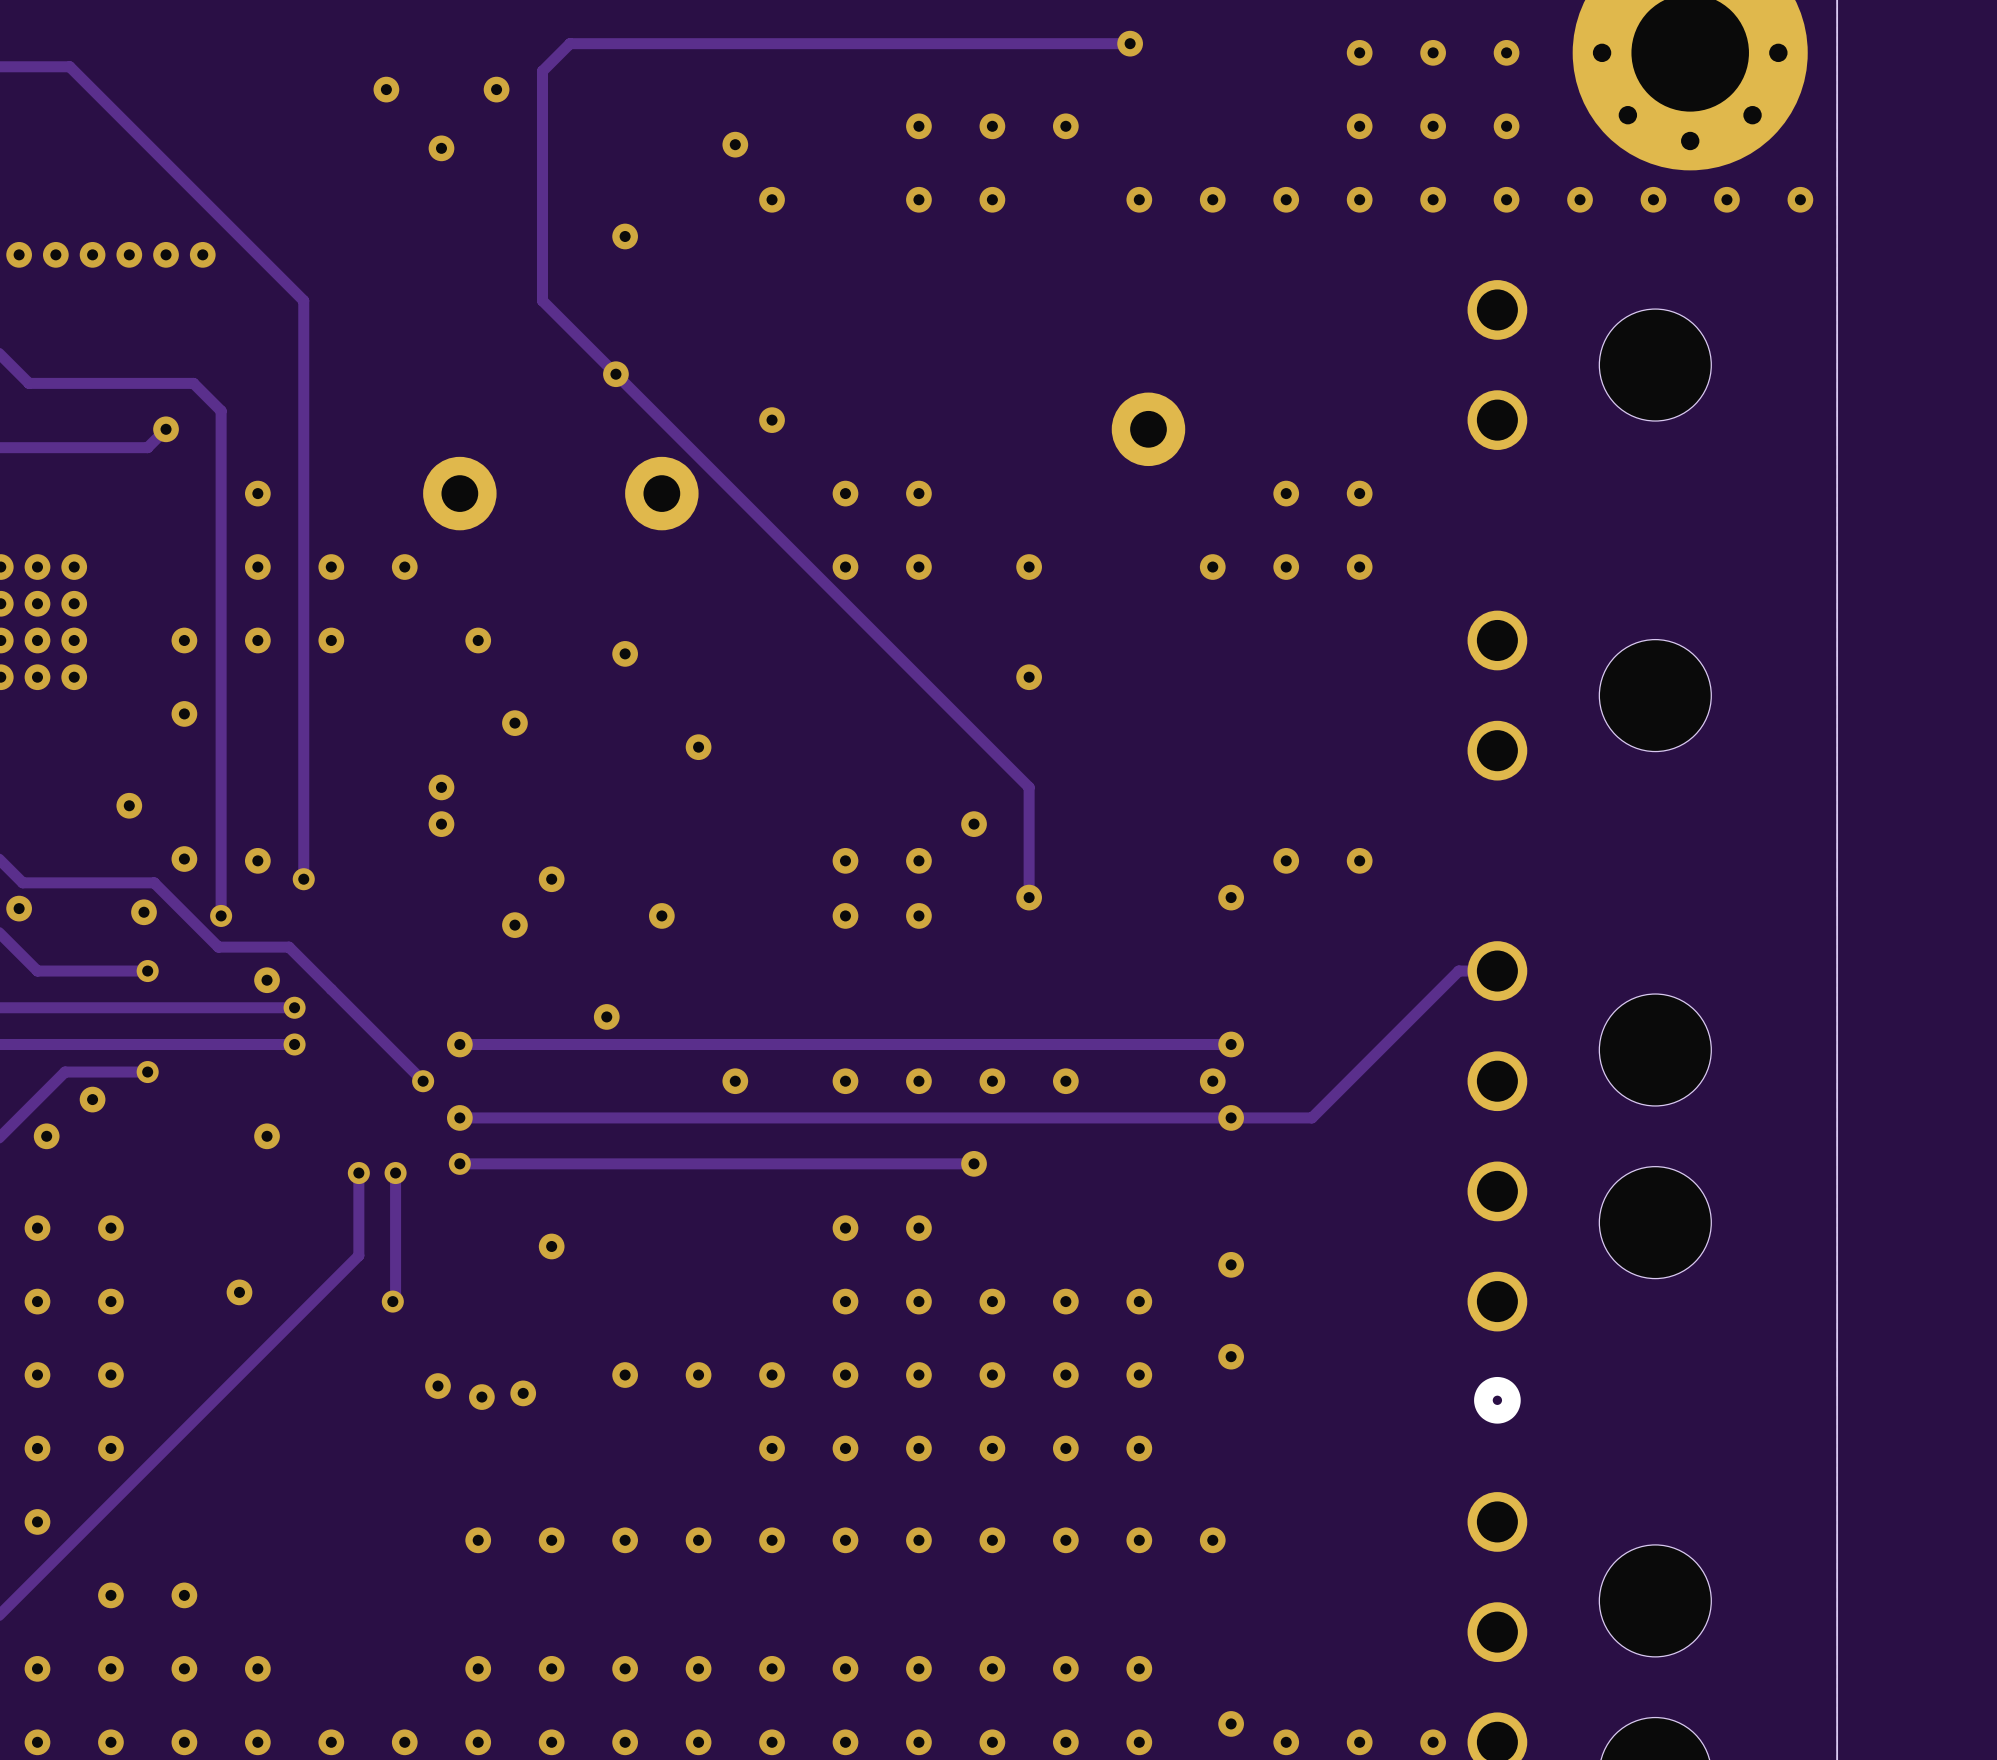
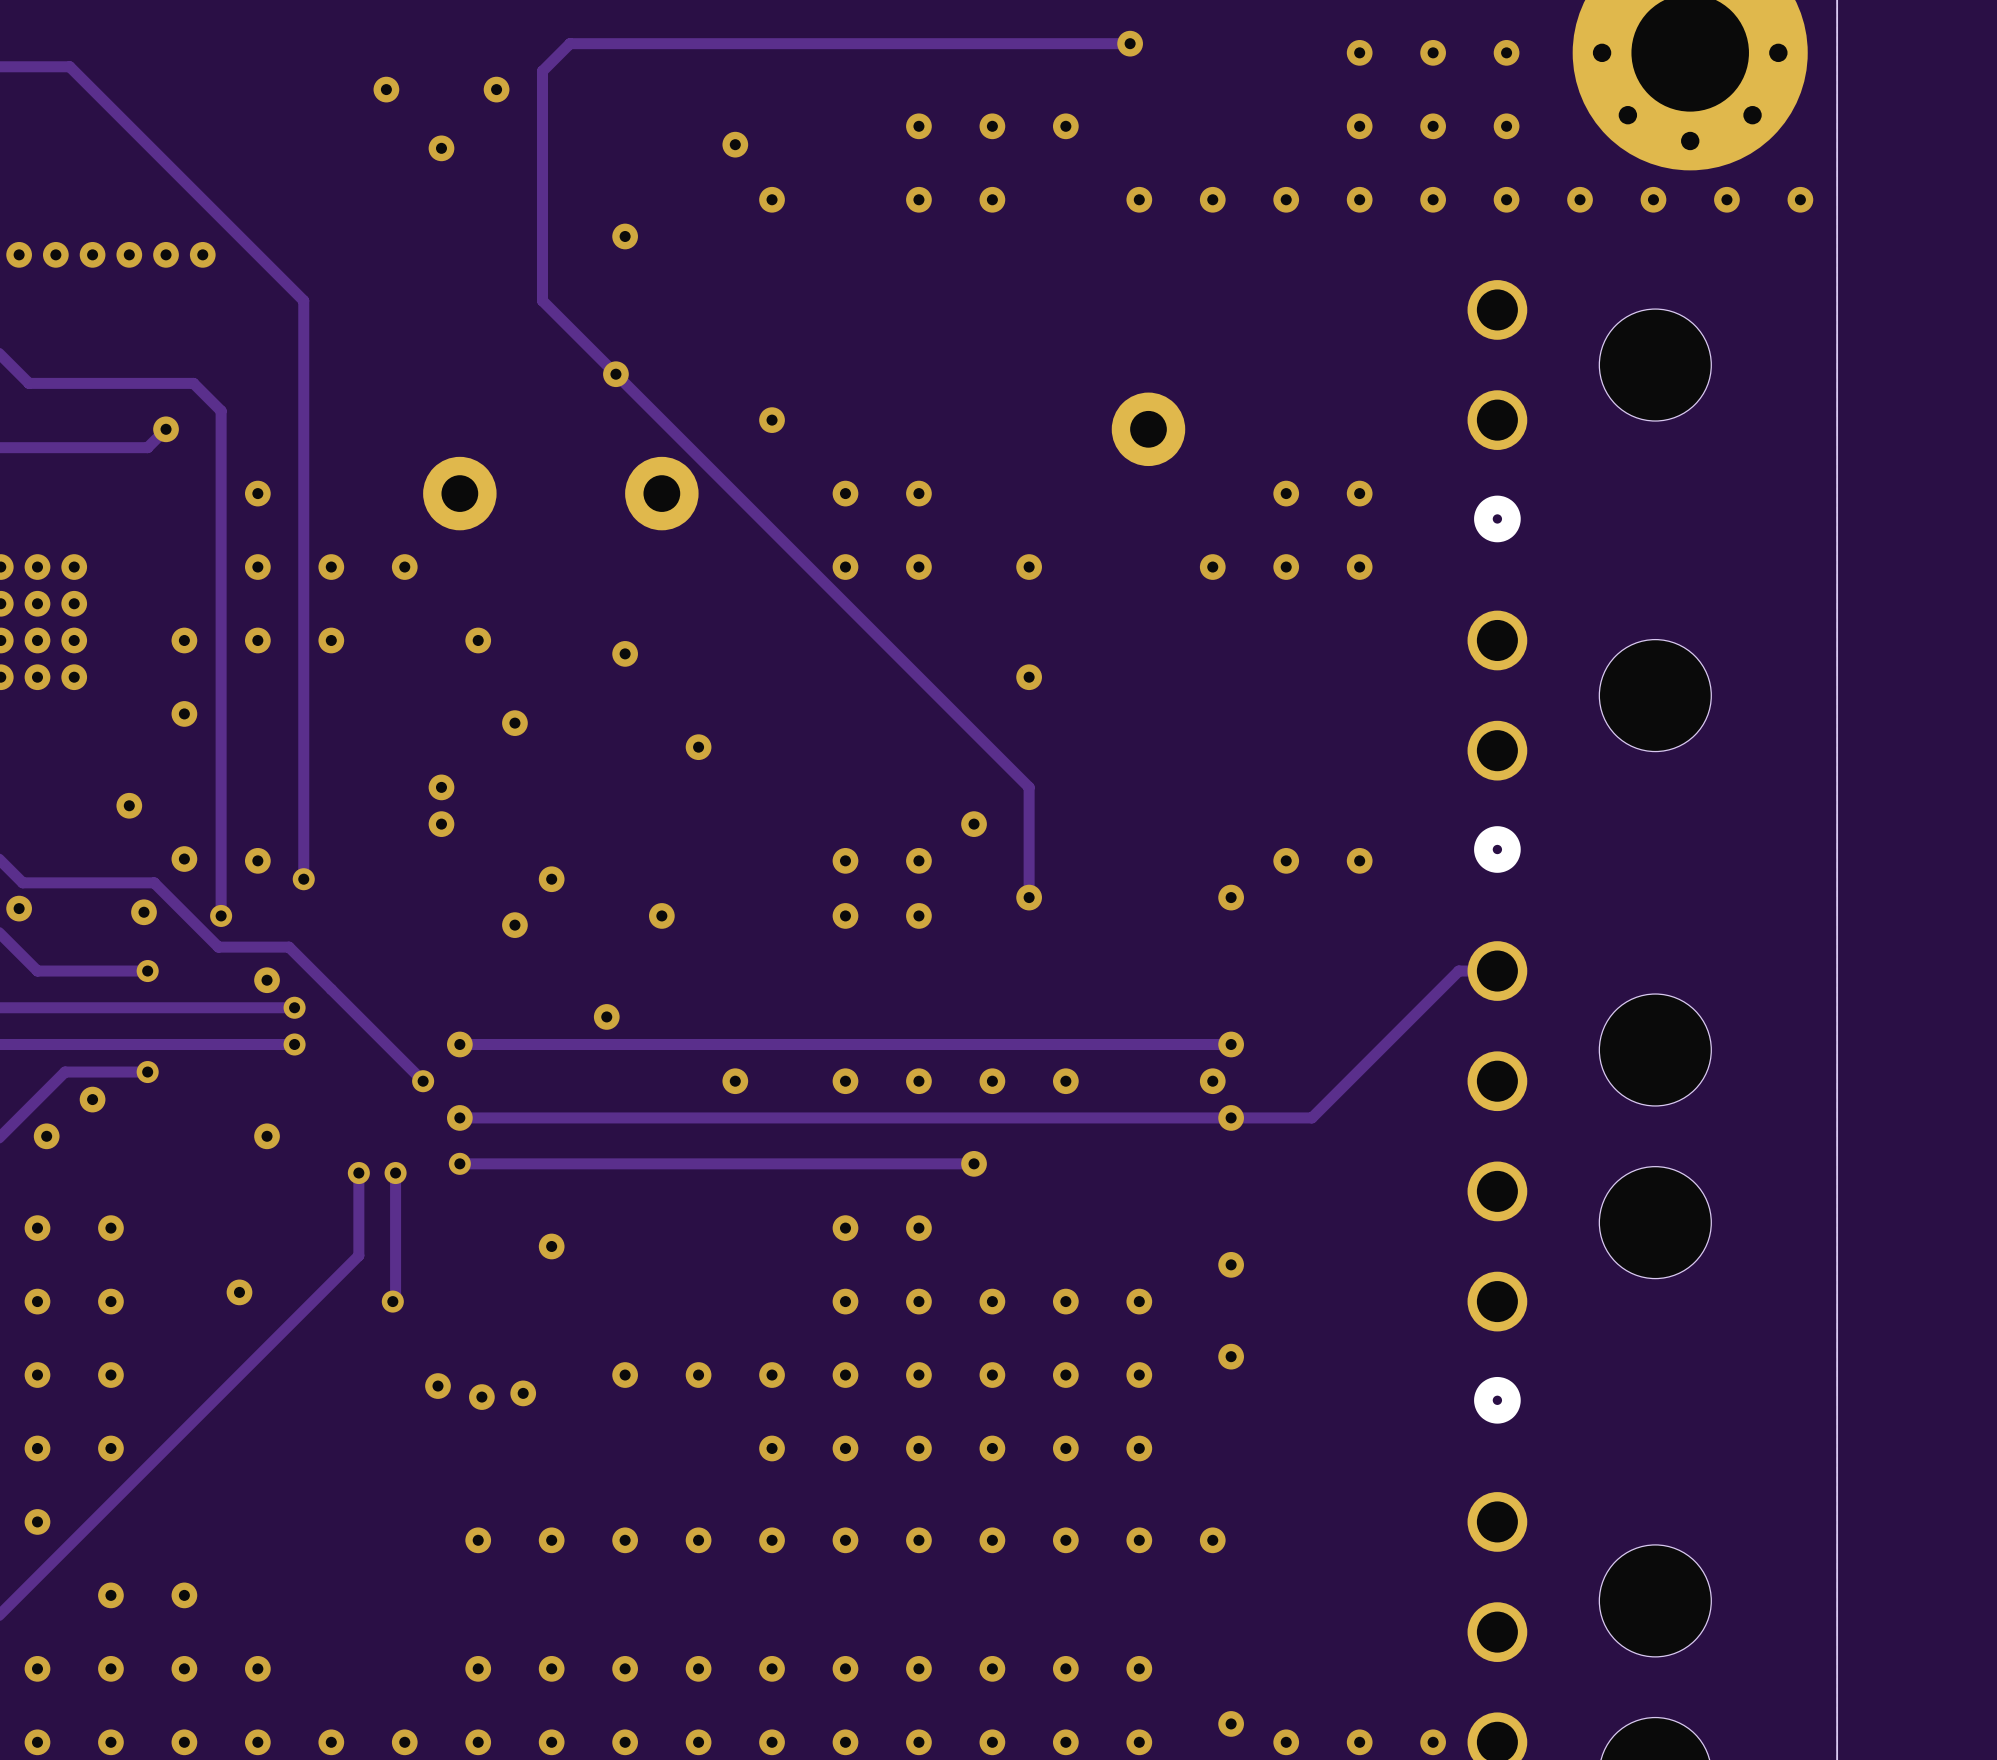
part footprint: [1467, 280, 1712, 529] -> [1467, 280, 1712, 543]
part footprint: [1467, 610, 1712, 859] -> [1467, 610, 1712, 873]

